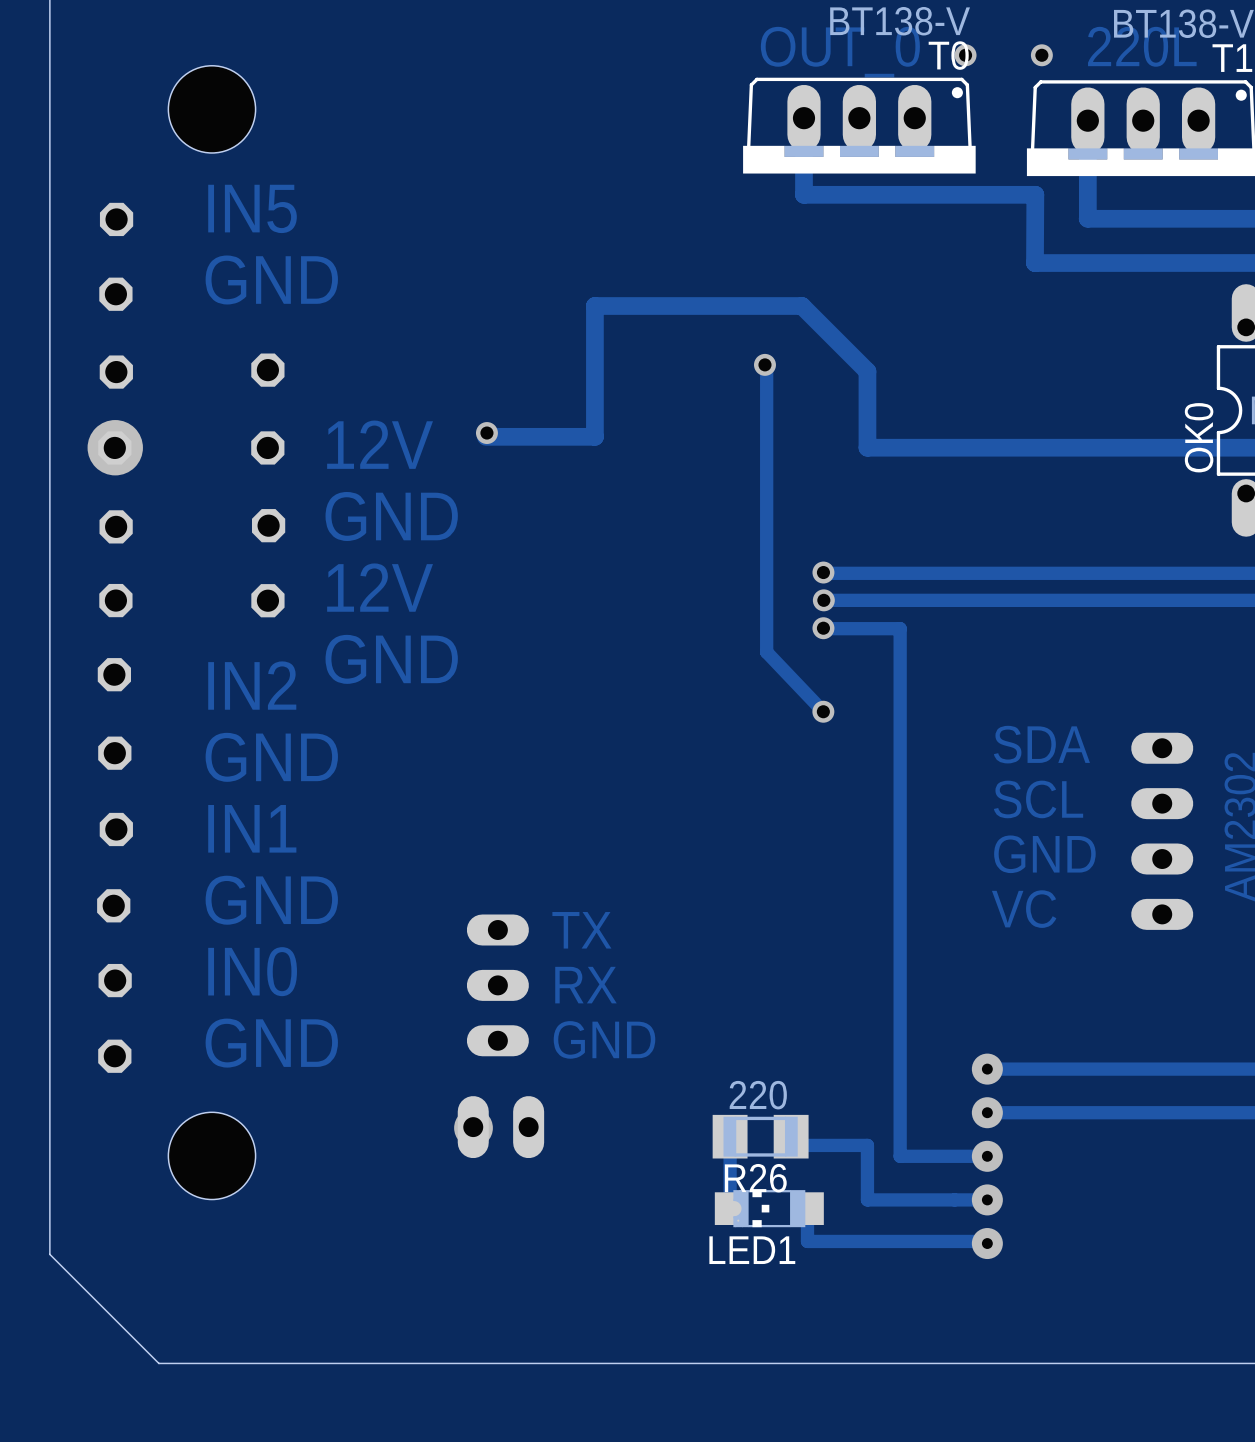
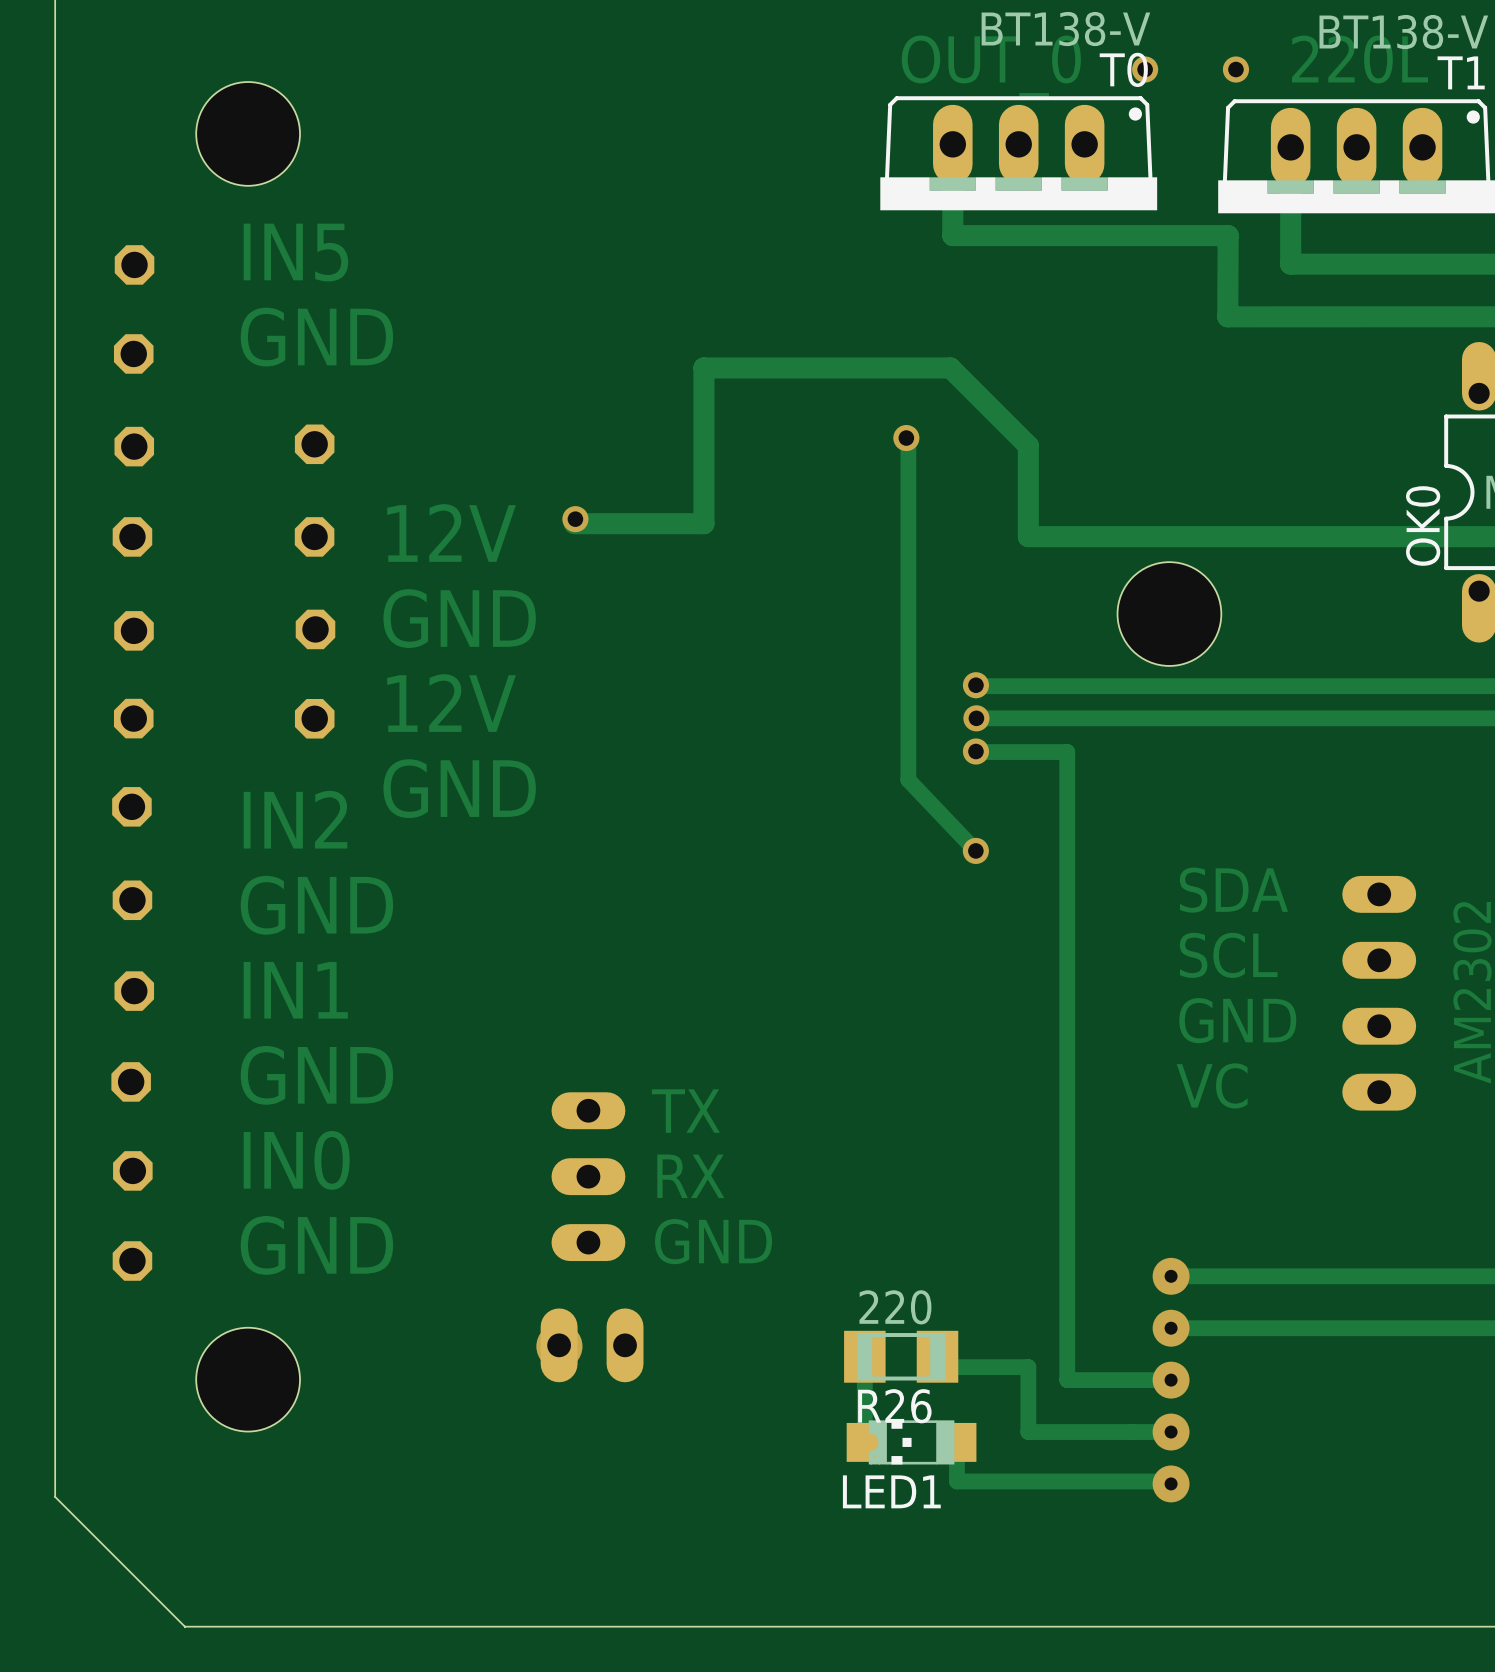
via: (115, 447) -> none
hole: none -> (1169, 614)

